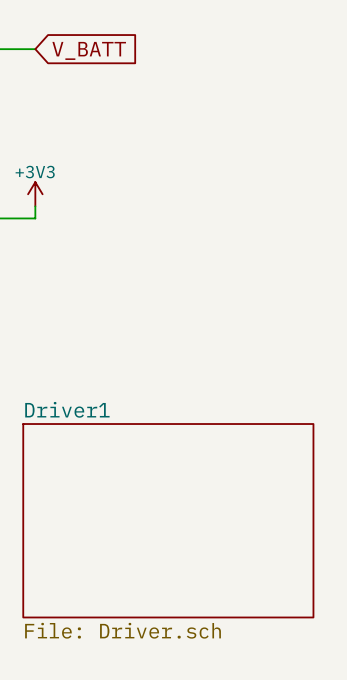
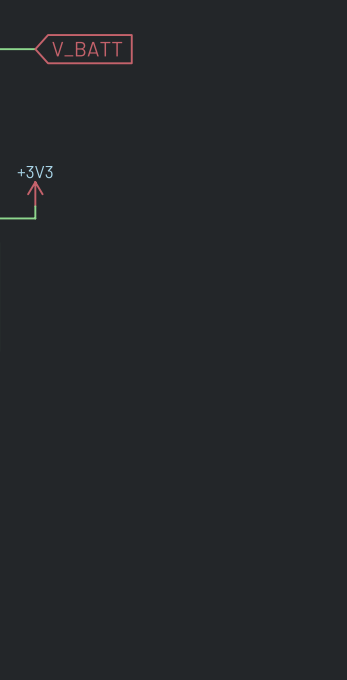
sheet Driver1: File: Driver.sch (168, 520) -> none

